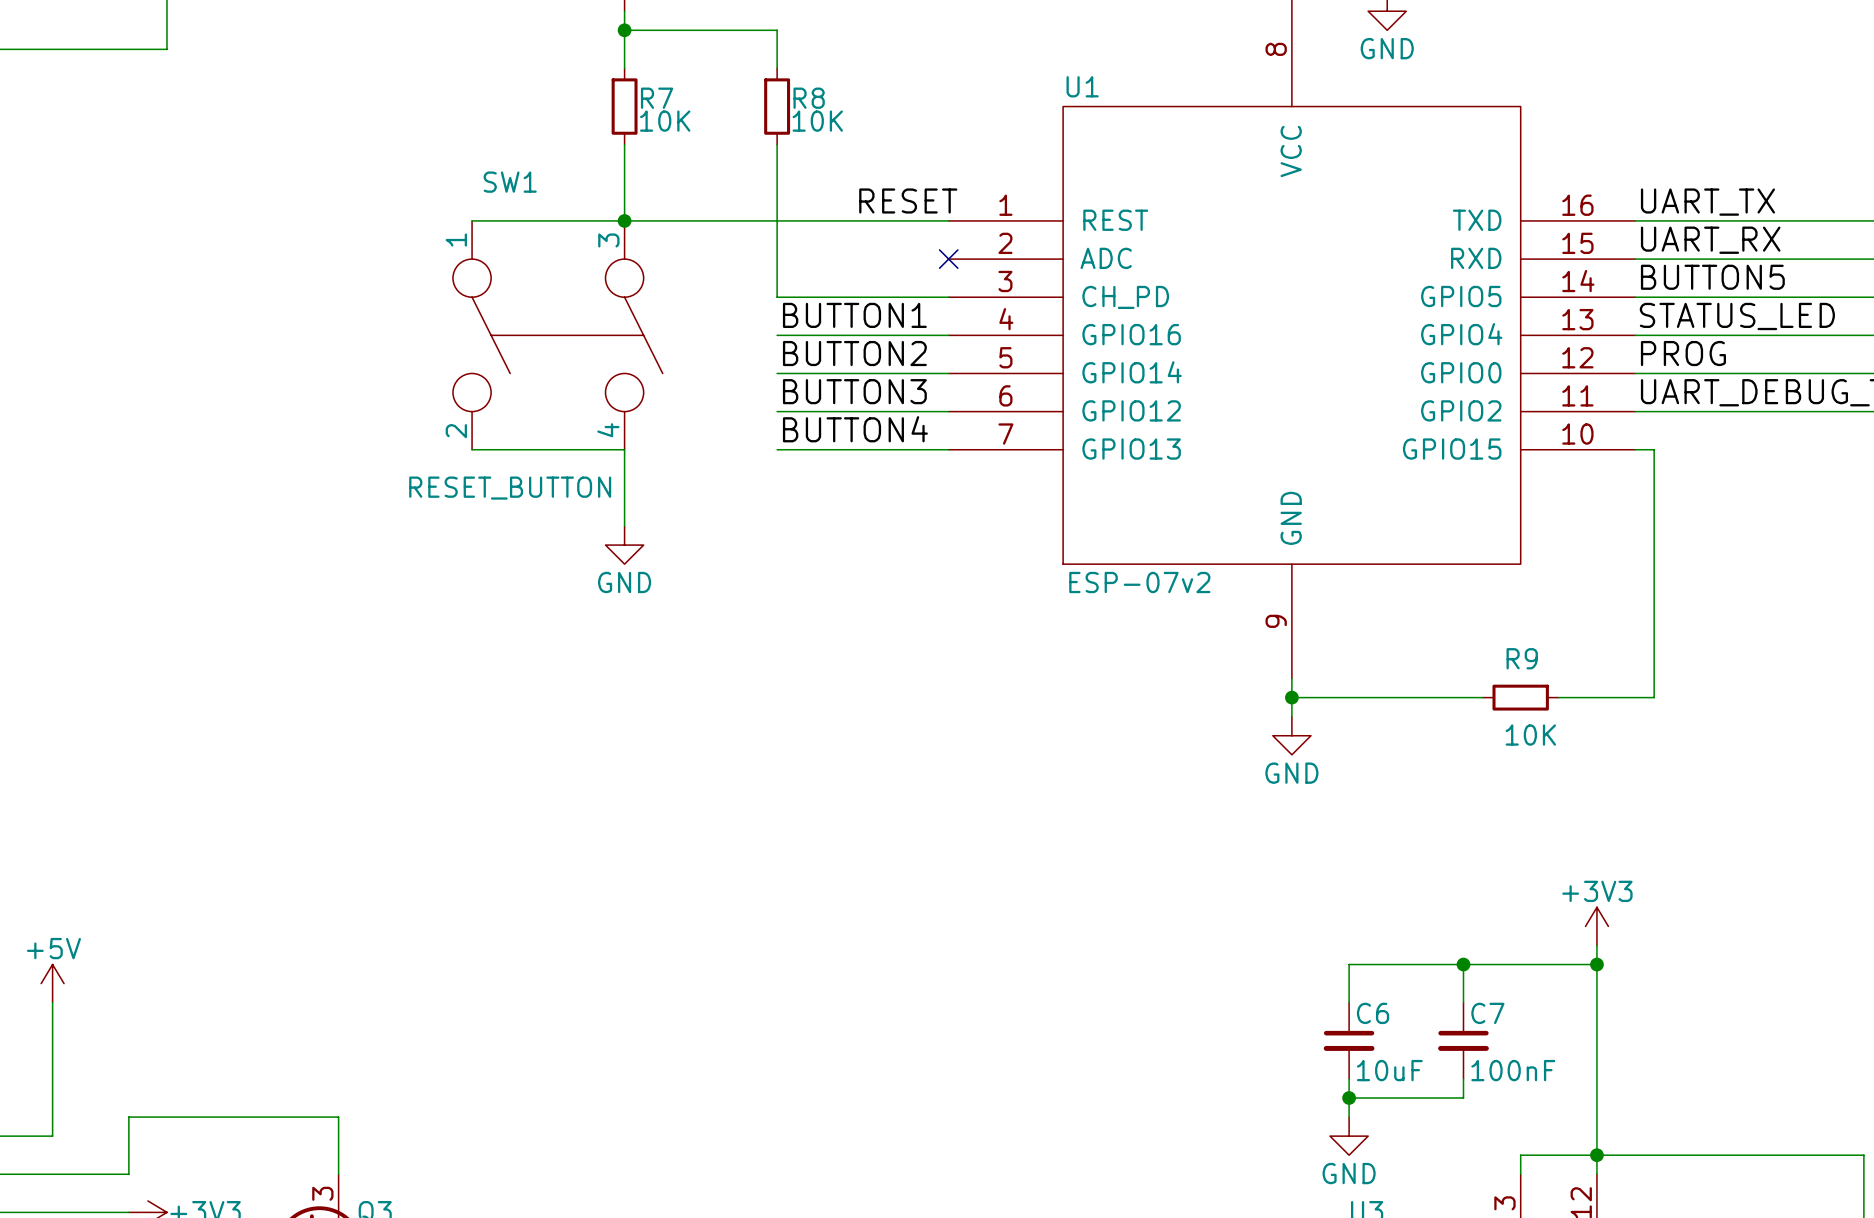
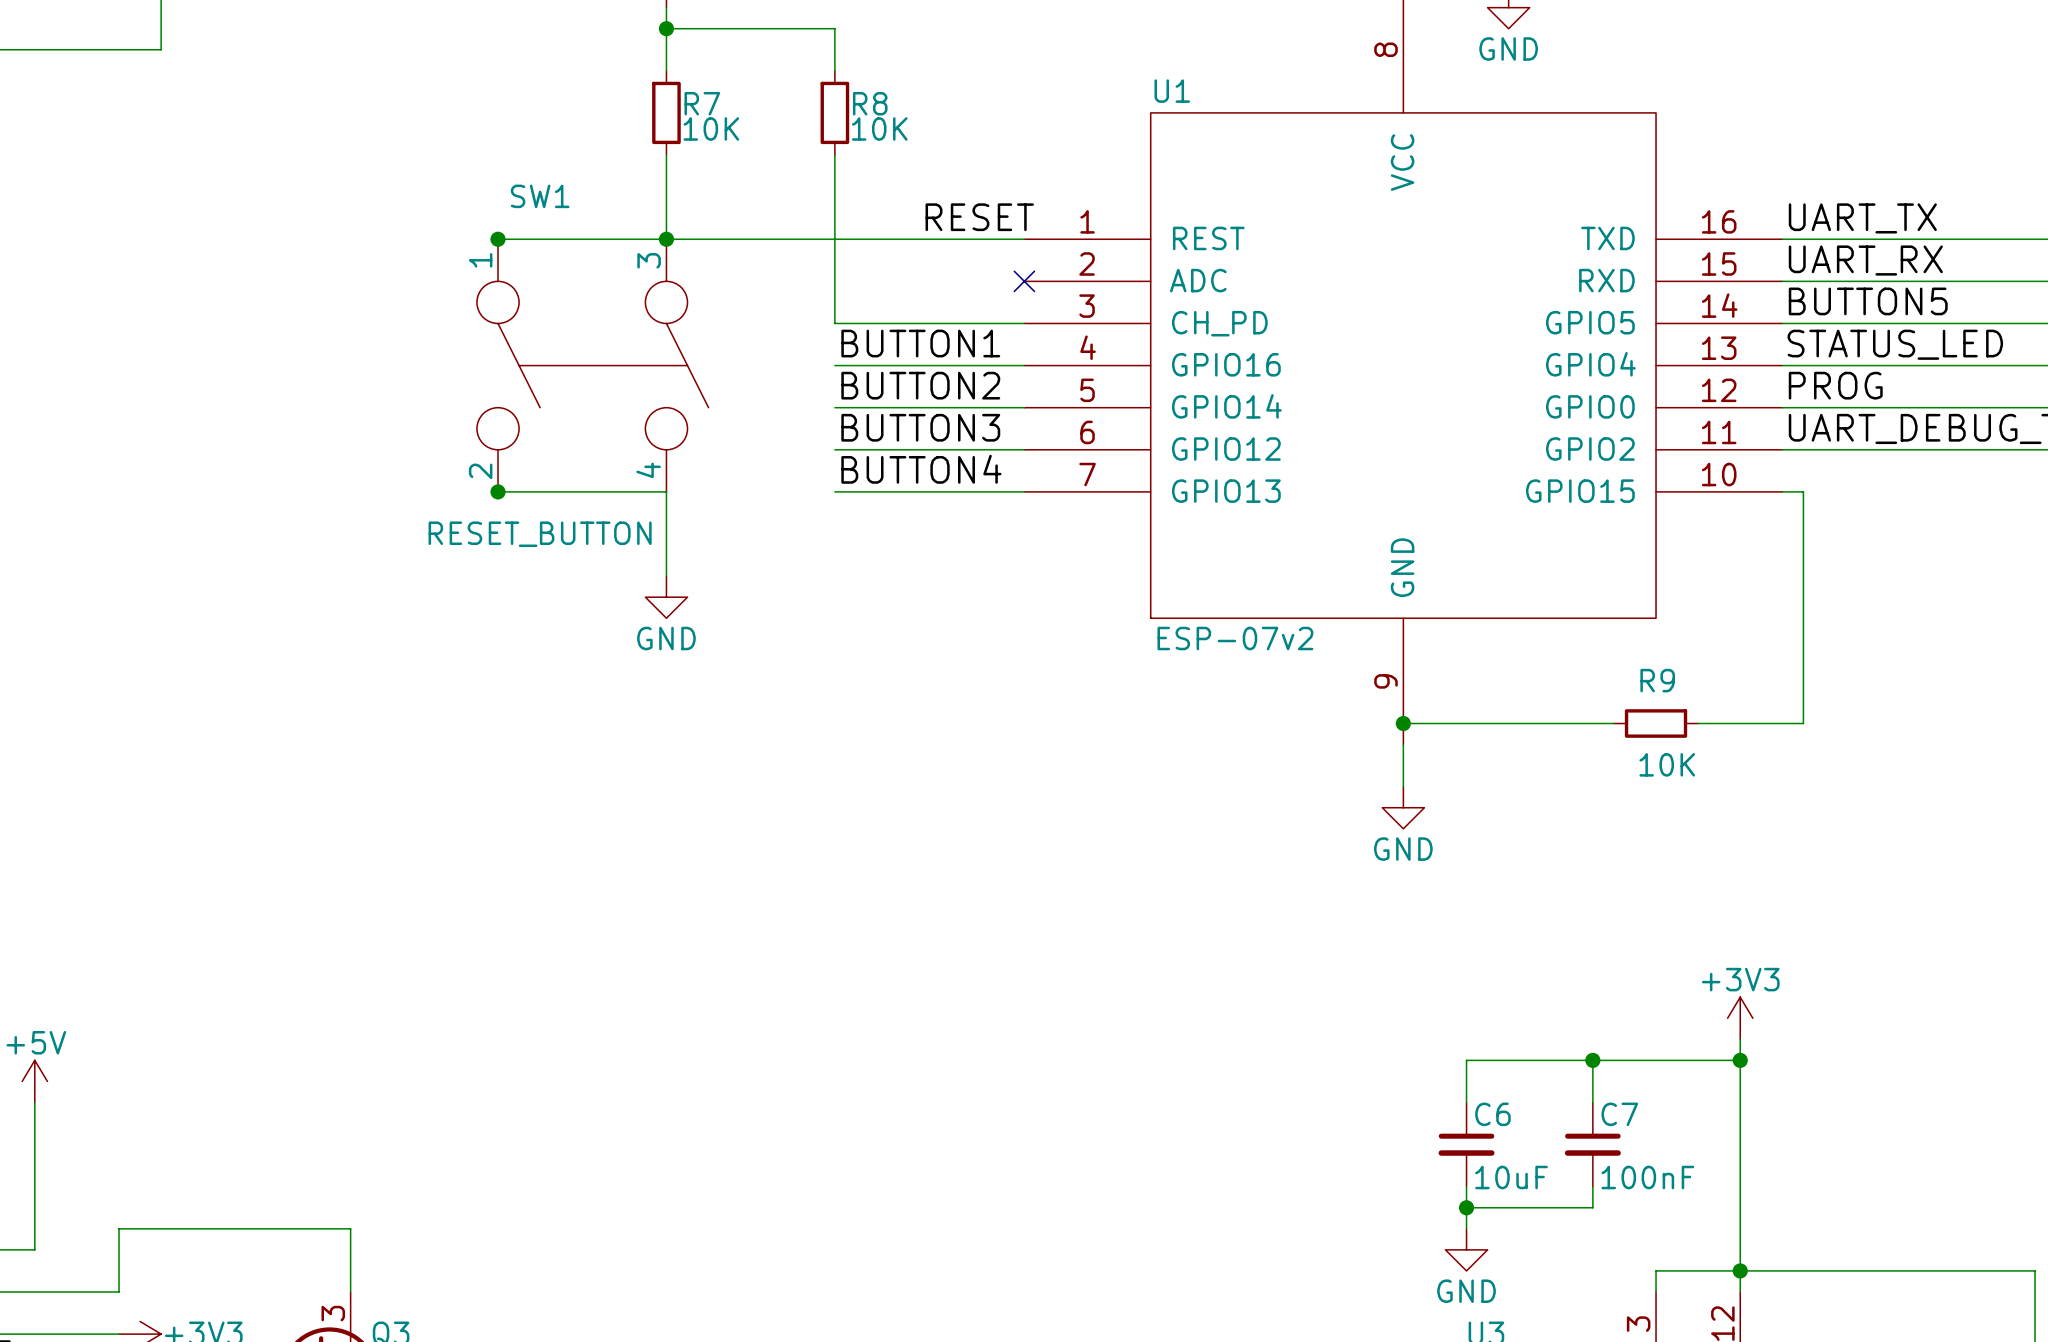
junction: none -> (498, 239)
junction: none -> (498, 491)
wire: (1654, 659) (1654, 697) (1558, 697) -> (1803, 723) (1698, 723)
wire: (1291, 697) (1482, 697) -> (1403, 723) (1613, 723)
junction position: (1291, 697) -> (1403, 723)
R9 position: (1520, 697) -> (1656, 723)

